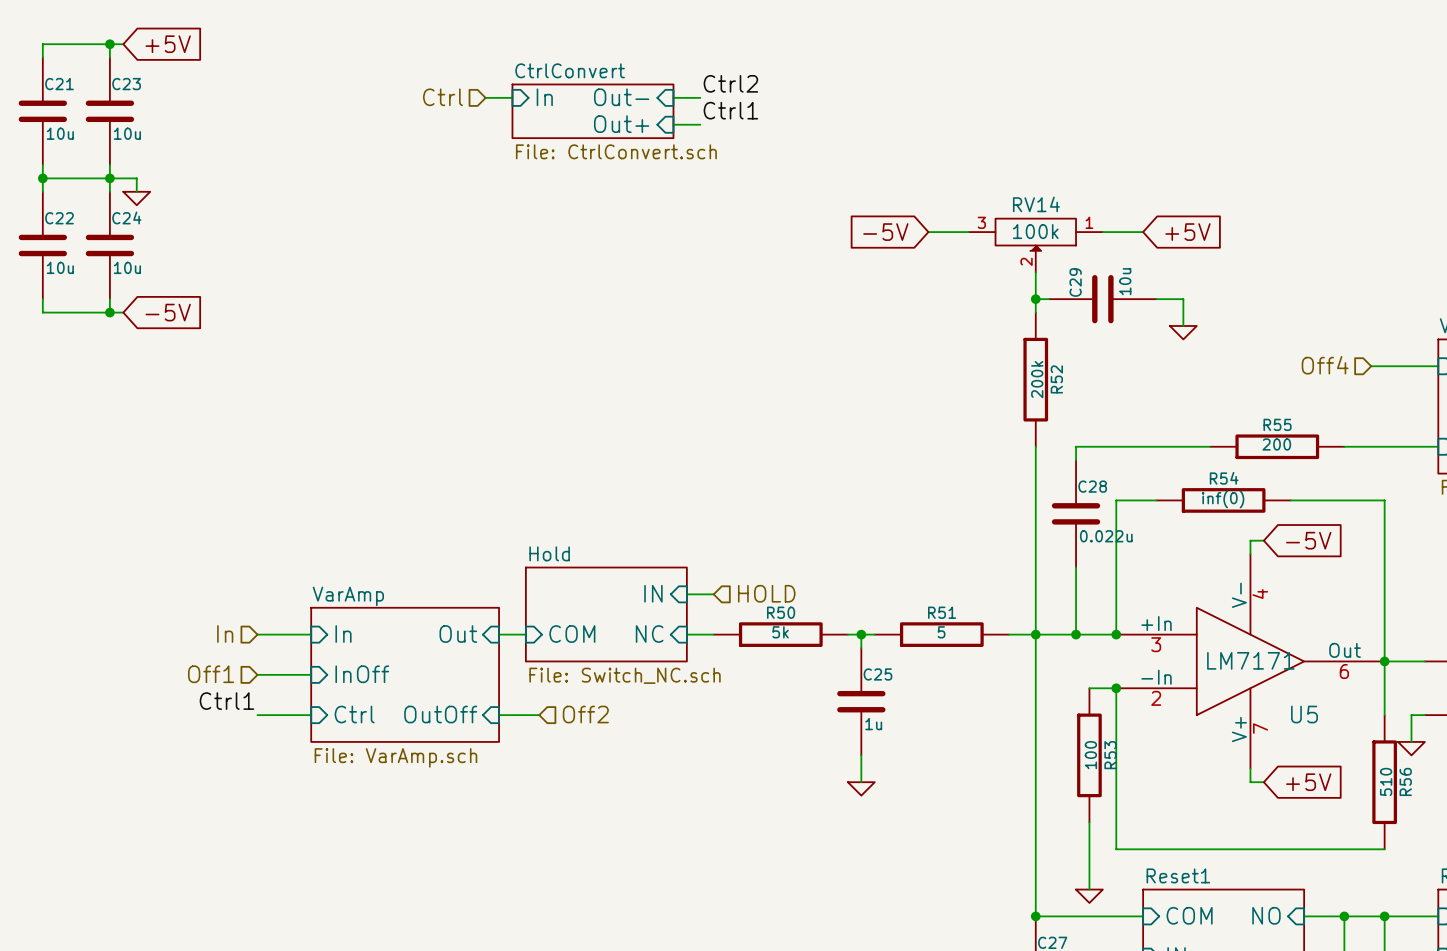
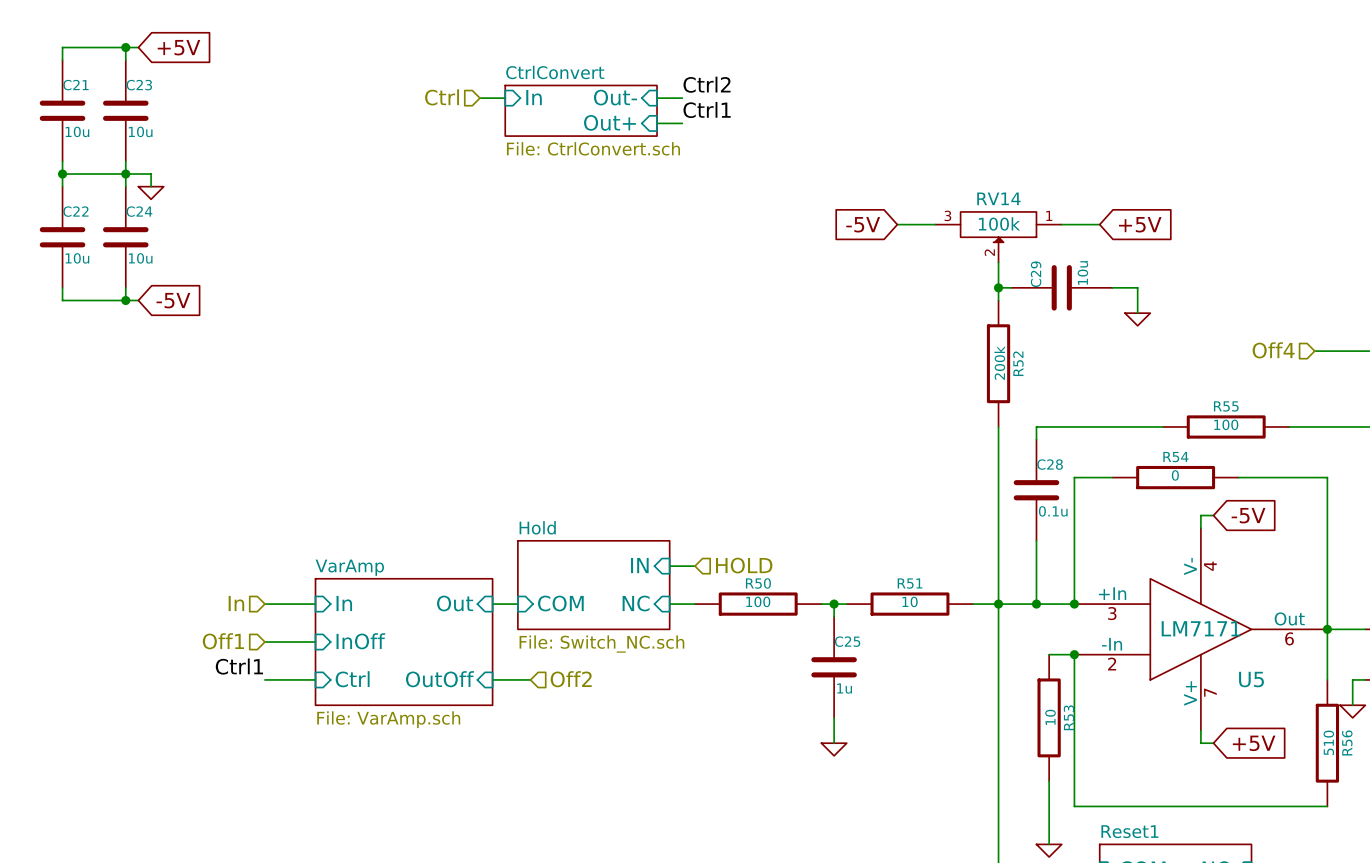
R55 value: 200 (1276, 444) -> 100 (1226, 424)
R54 value: inf(0) (1223, 499) -> 0 (1175, 475)
C28 value: 0.022u (1106, 536) -> 0.1u (1053, 511)
R50 value: 5k (780, 632) -> 100 (758, 601)
R51 value: 5 (941, 632) -> 10 (910, 601)
R53 value: 100 (1090, 755) -> 10 (1050, 717)

